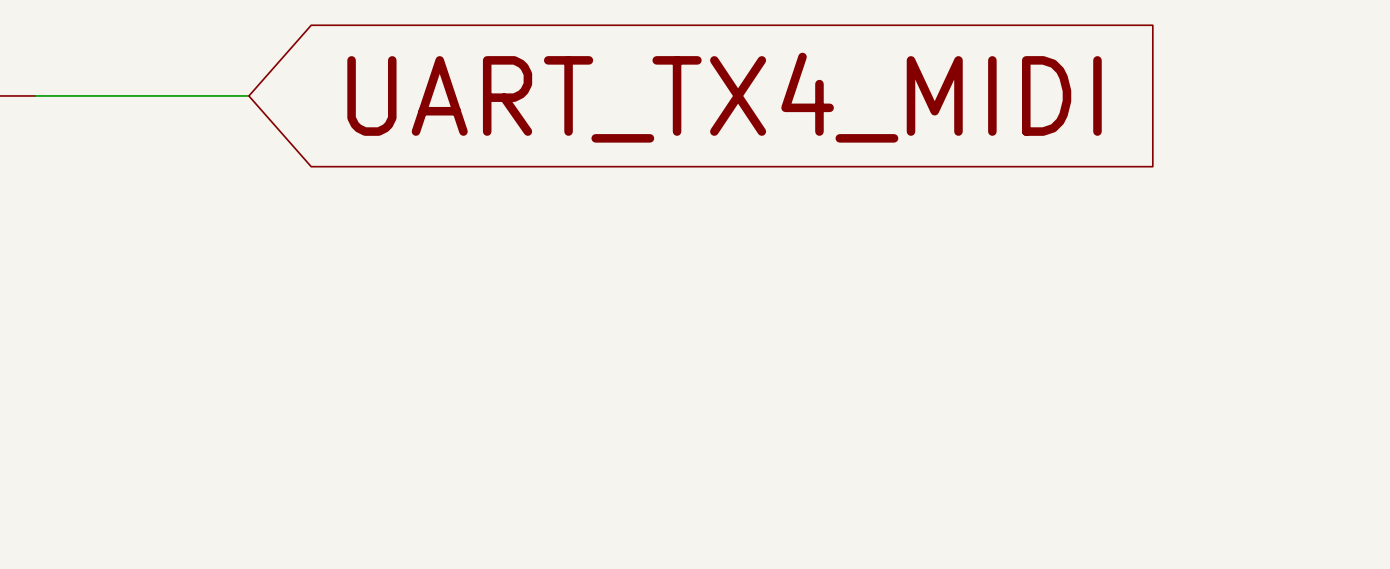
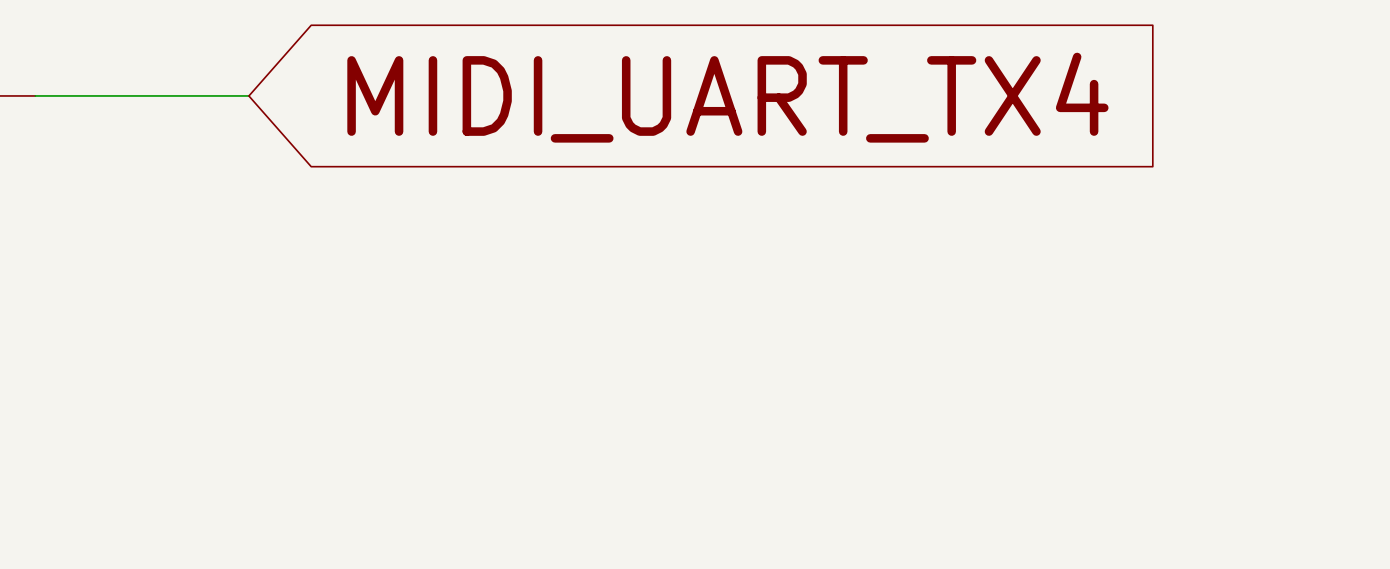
global label: UART_TX4_MIDI (724, 97) -> MIDI_UART_TX4 (727, 97)

